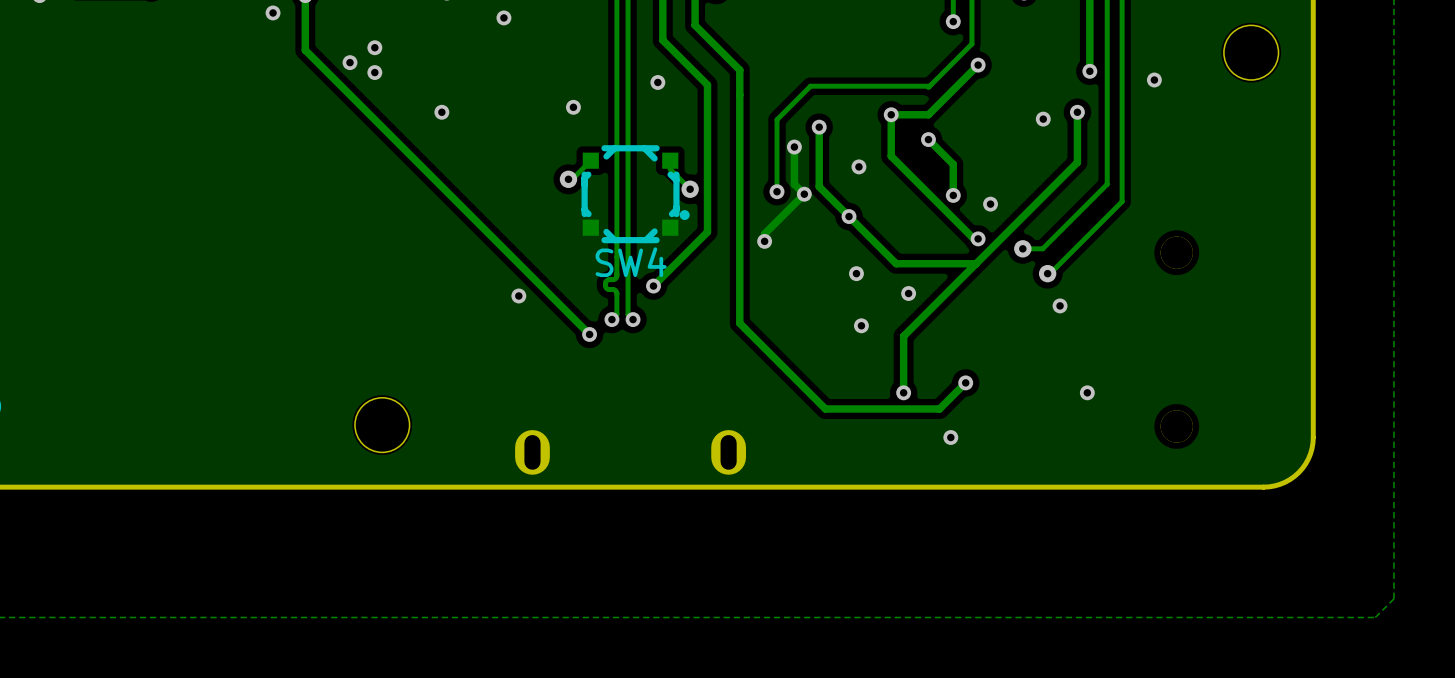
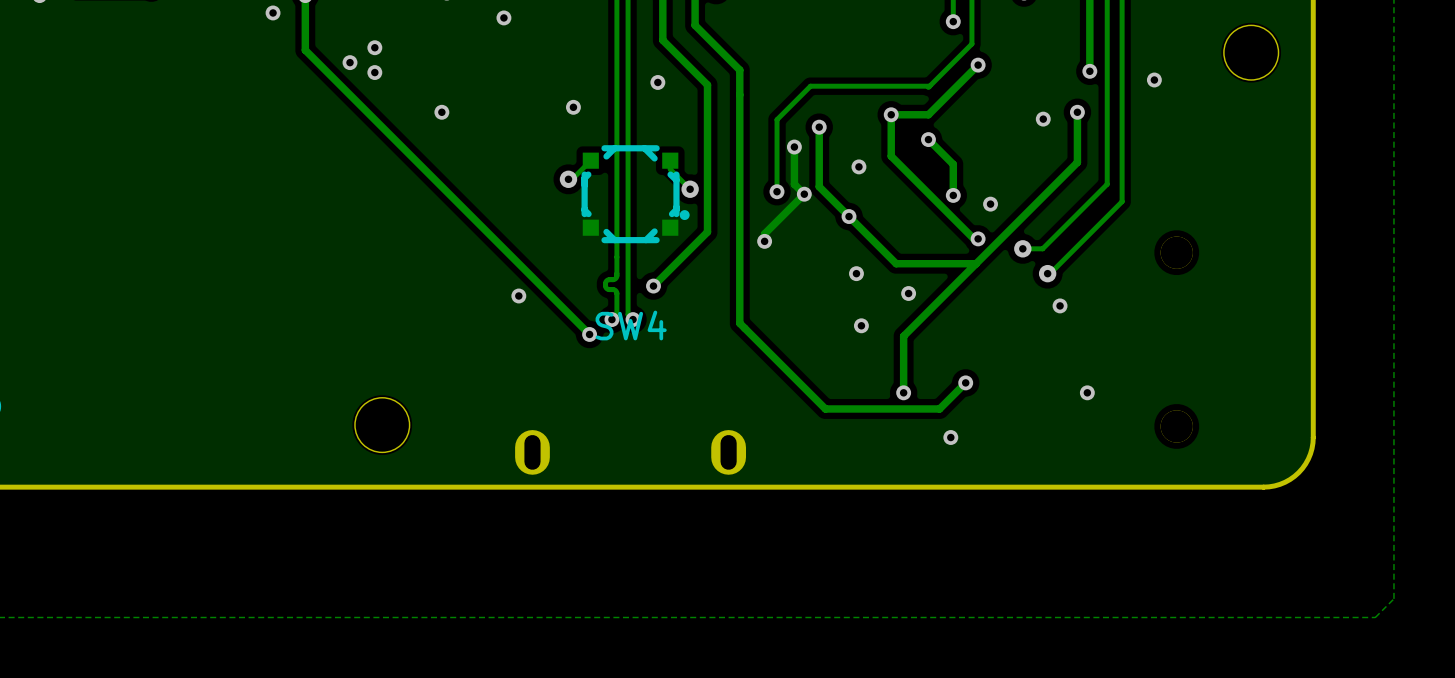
SW4 name position: SW4 (631, 262) -> SW4 (631, 325)

